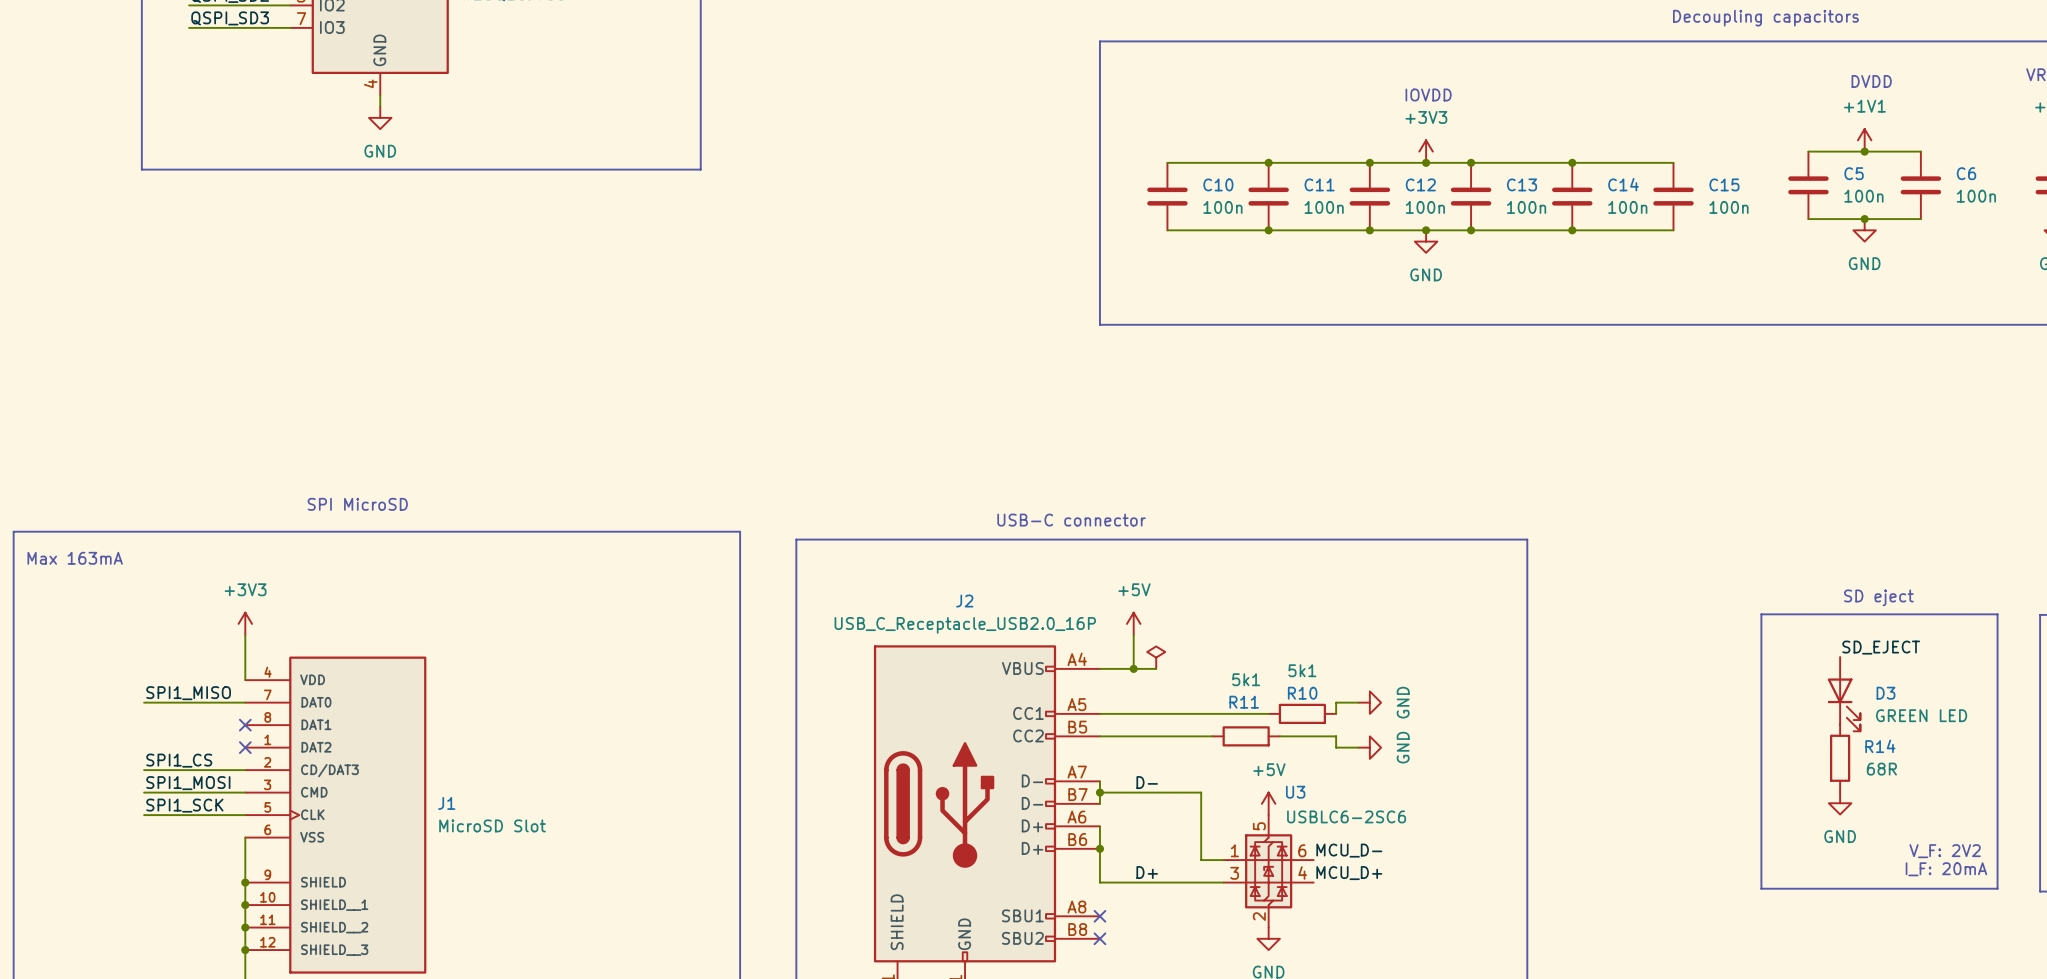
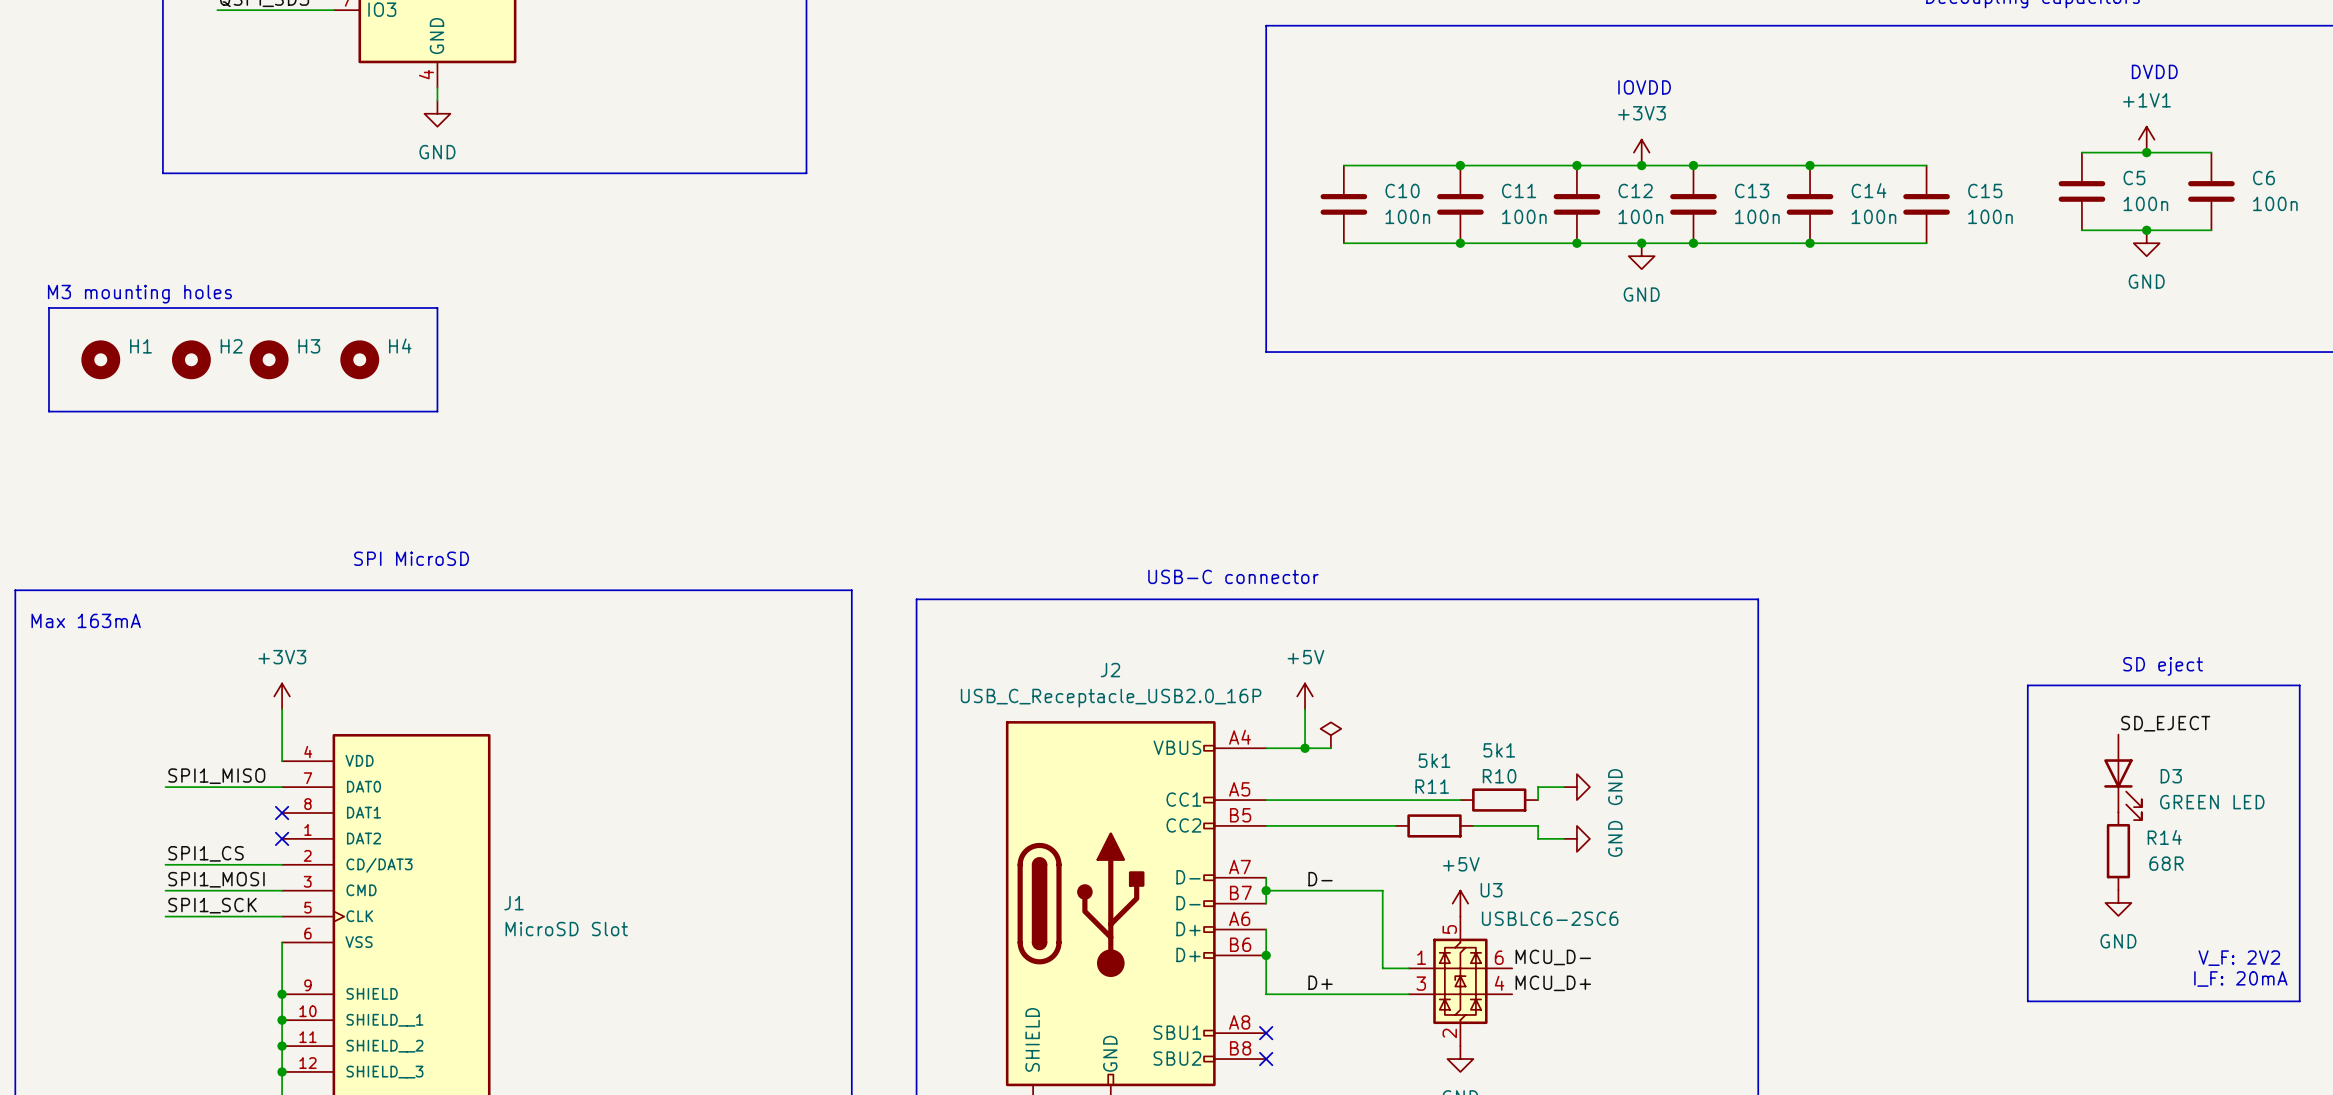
text: none -> M3 mounting holes (139, 294)
line: none -> (48, 307) (437, 307) (437, 411) (48, 411) (48, 307)
H1: none -> (100, 359)
H2: none -> (191, 359)
H3: none -> (269, 359)
H4: none -> (359, 359)

